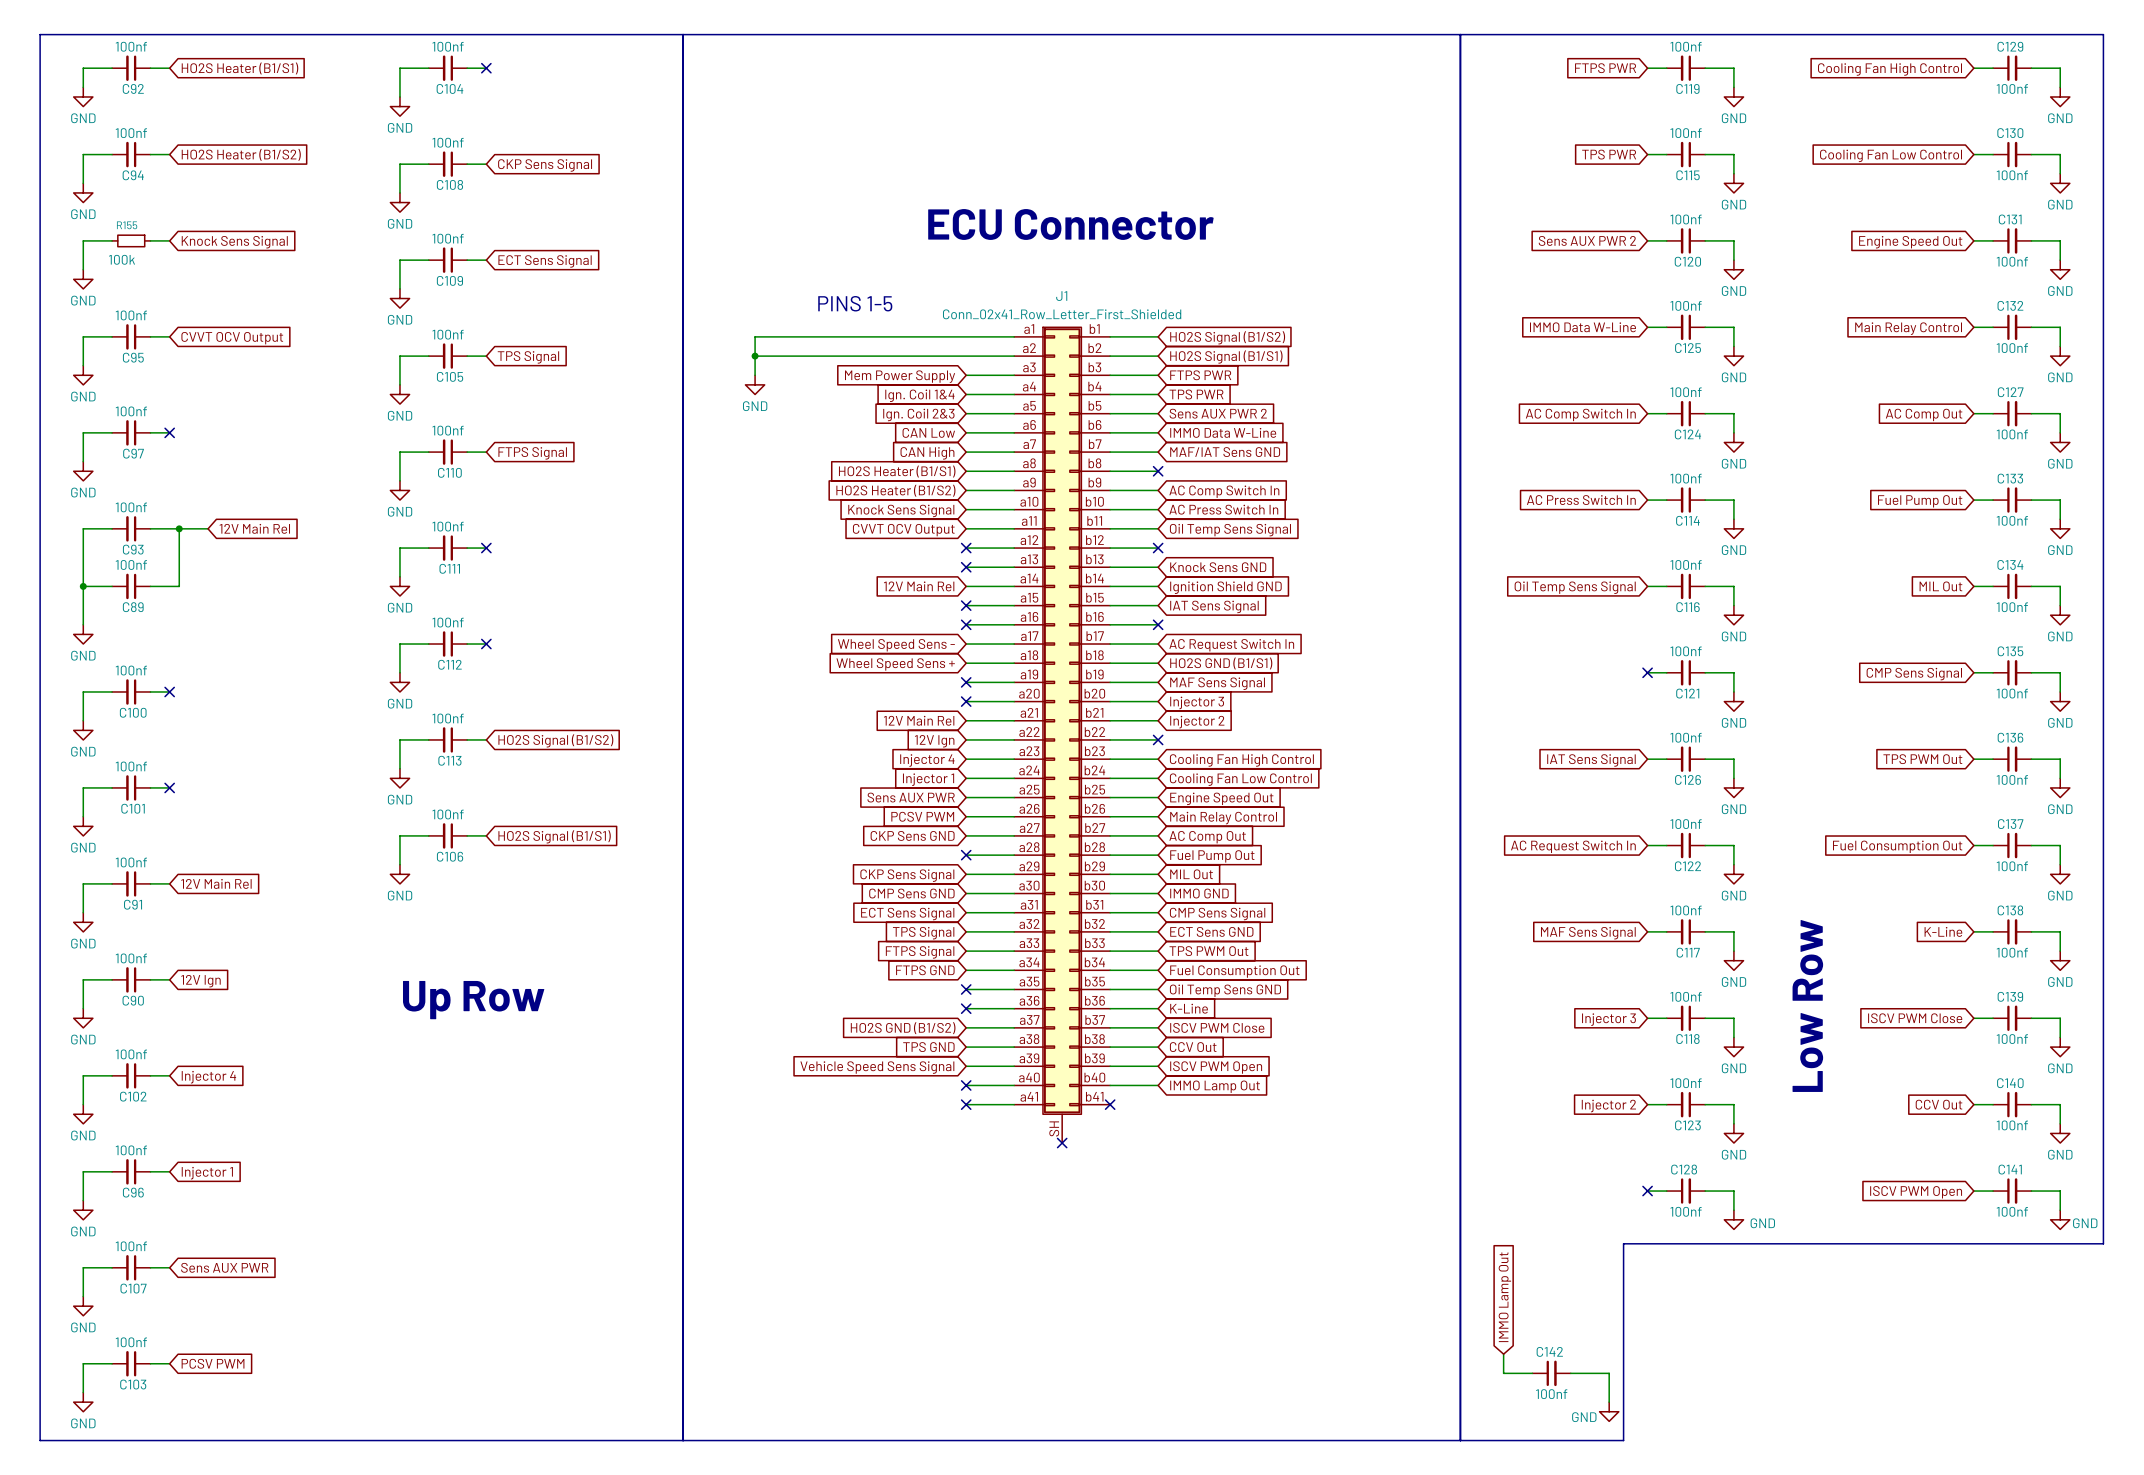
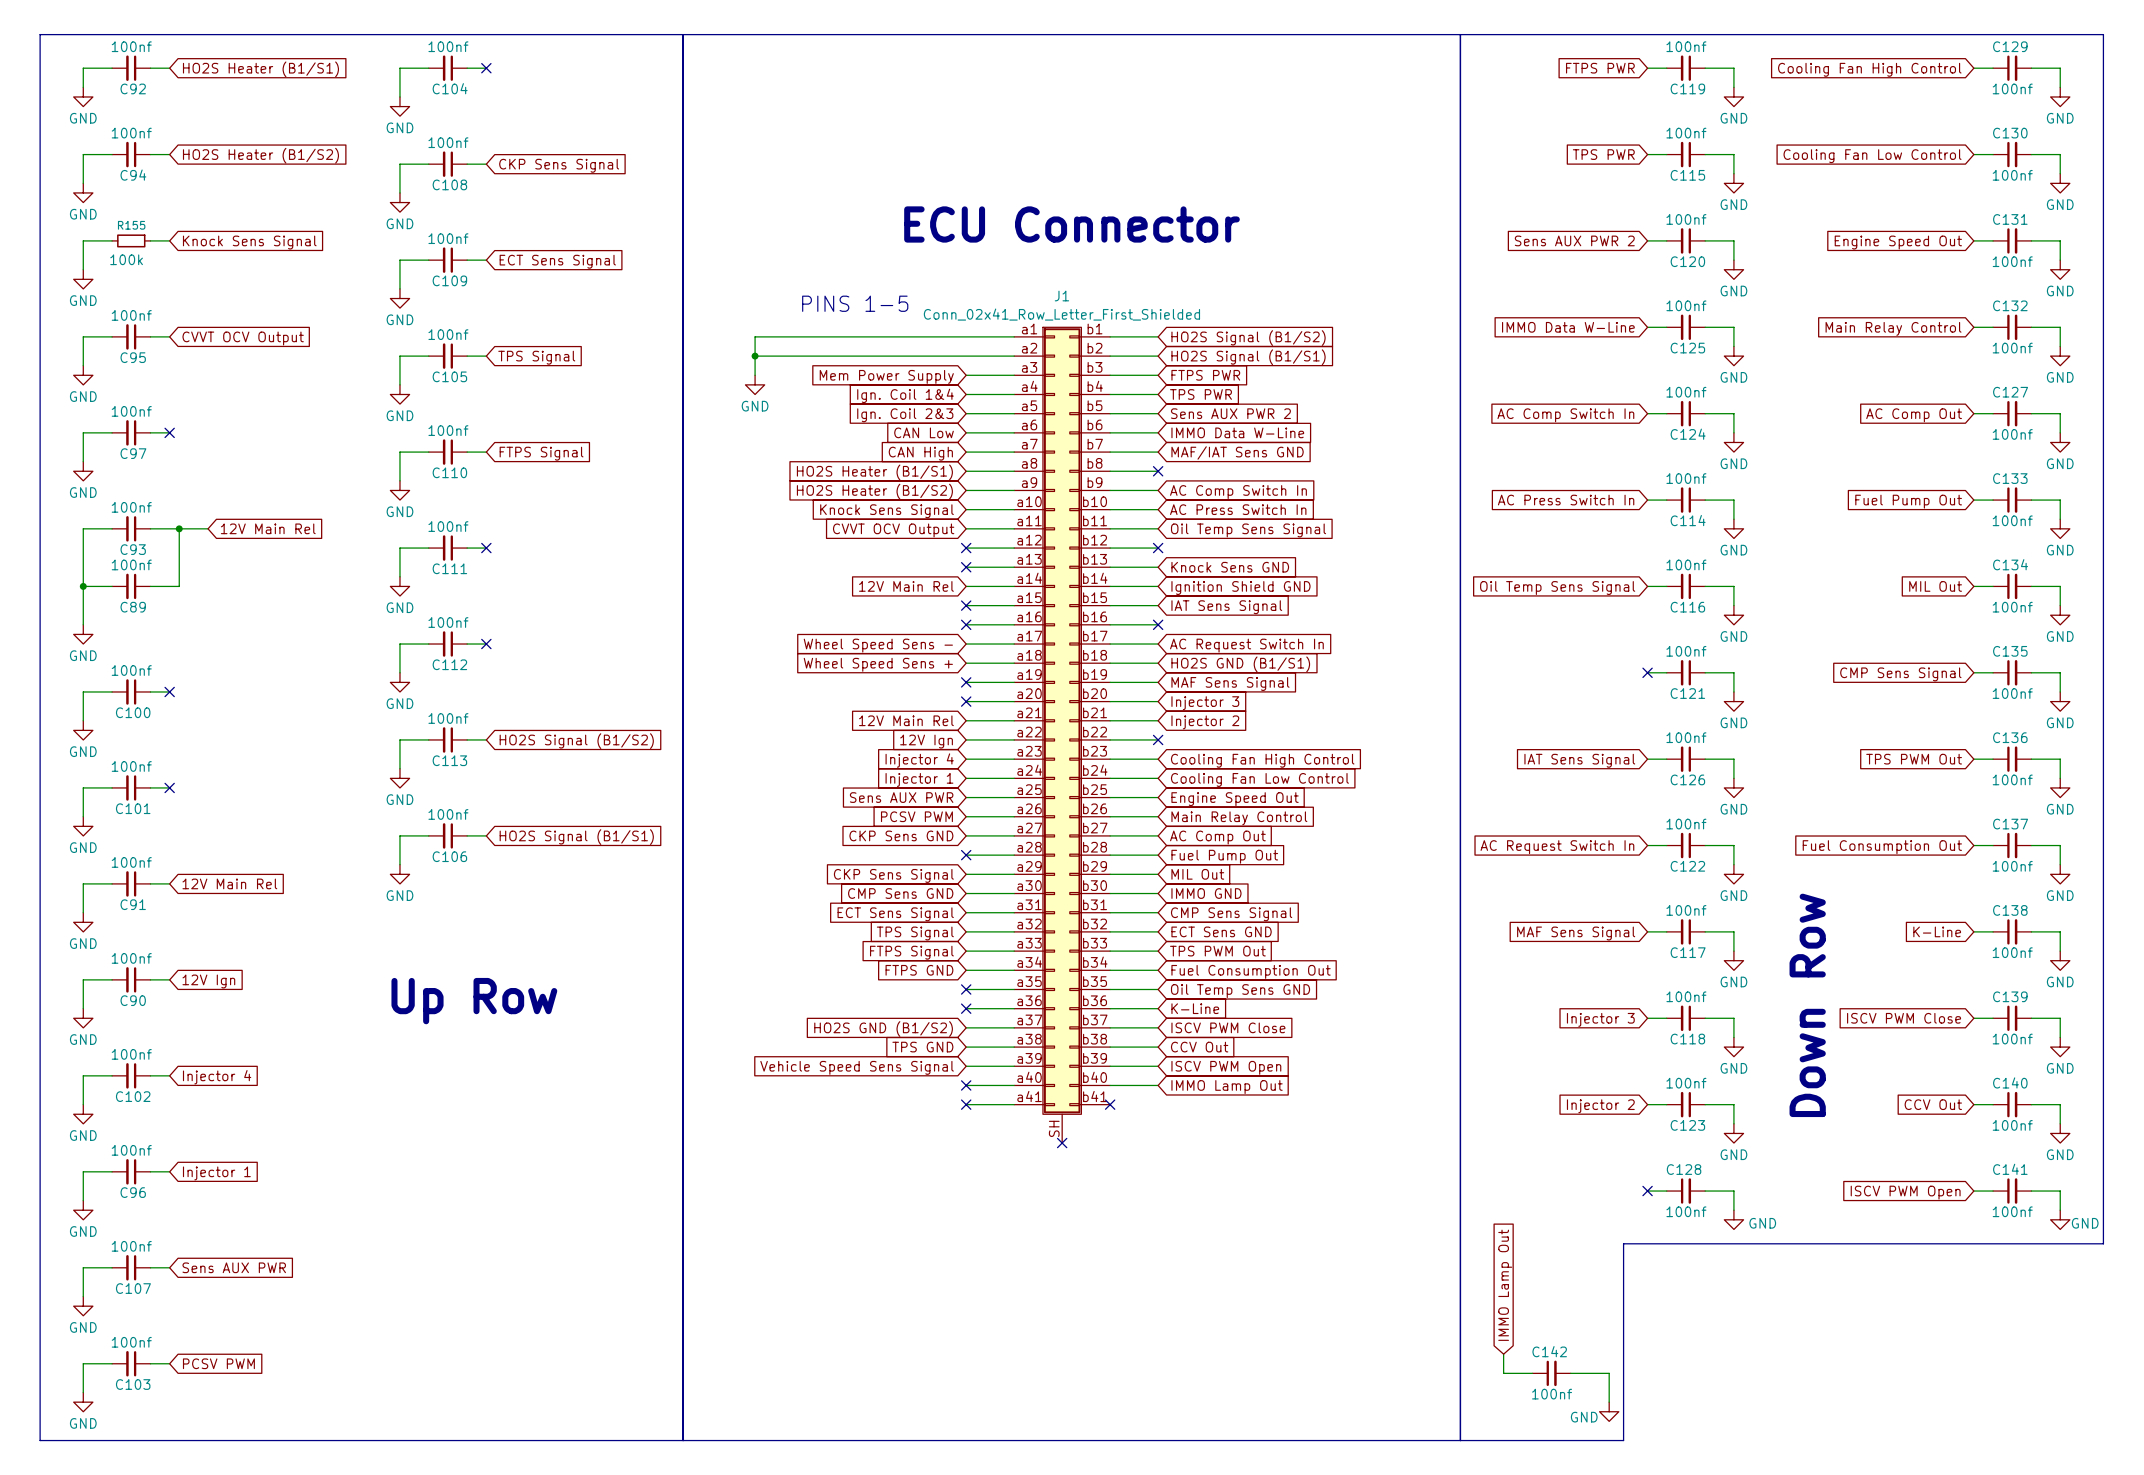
text: Low Row (1807, 1005) -> Down Row (1807, 1005)

